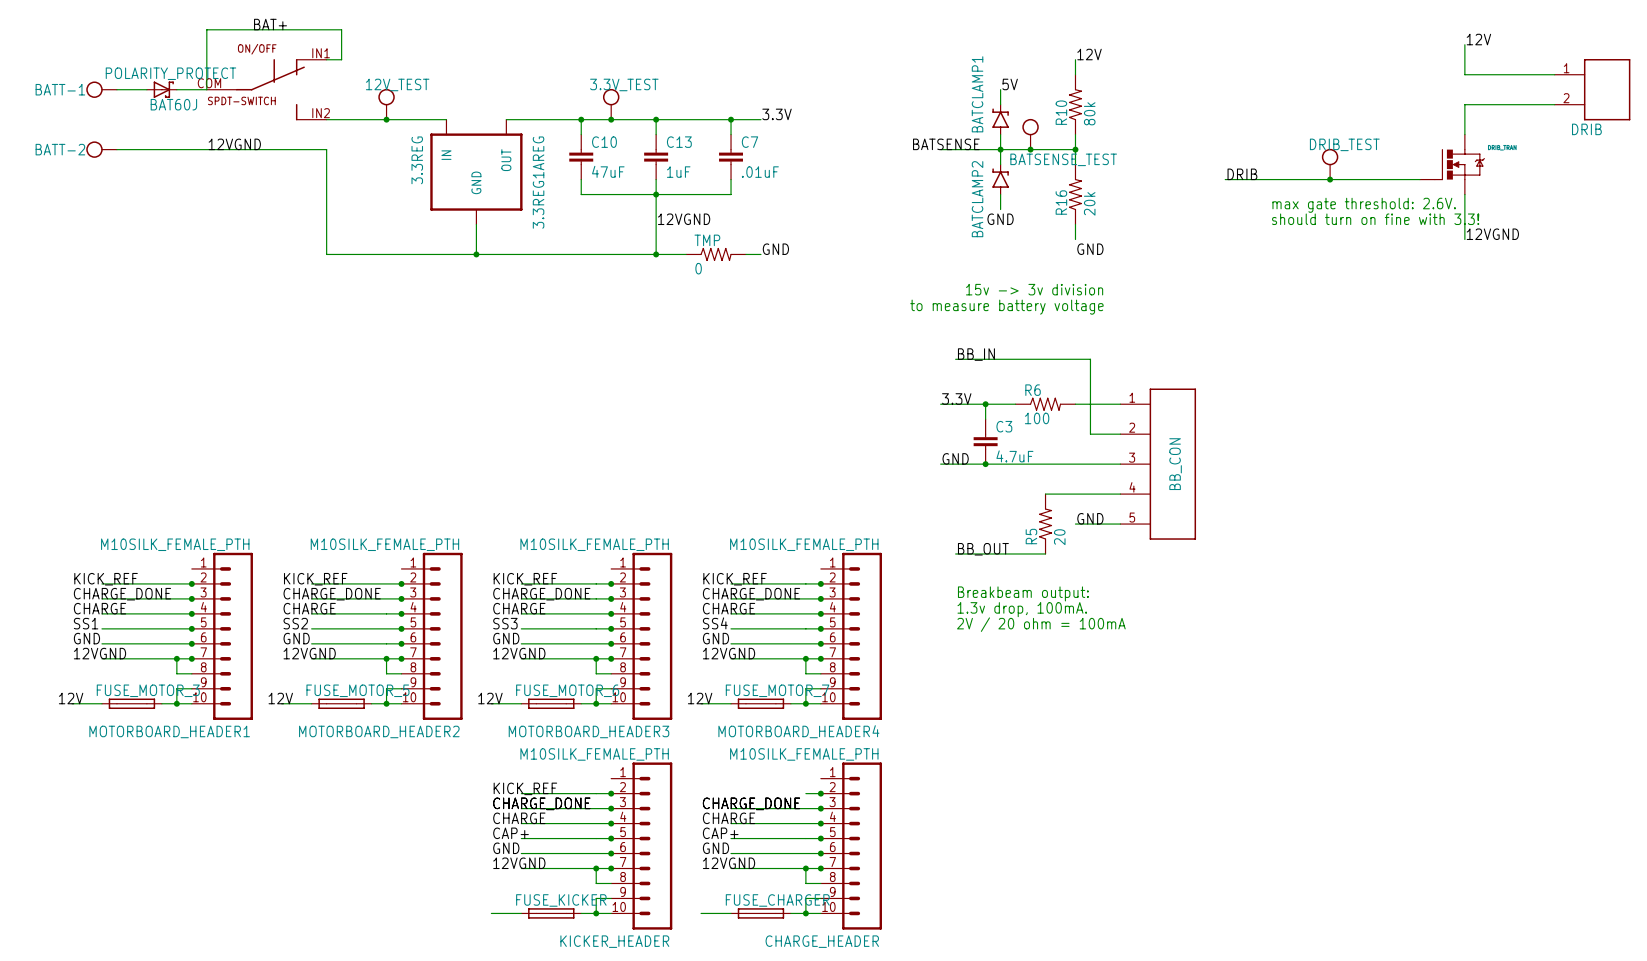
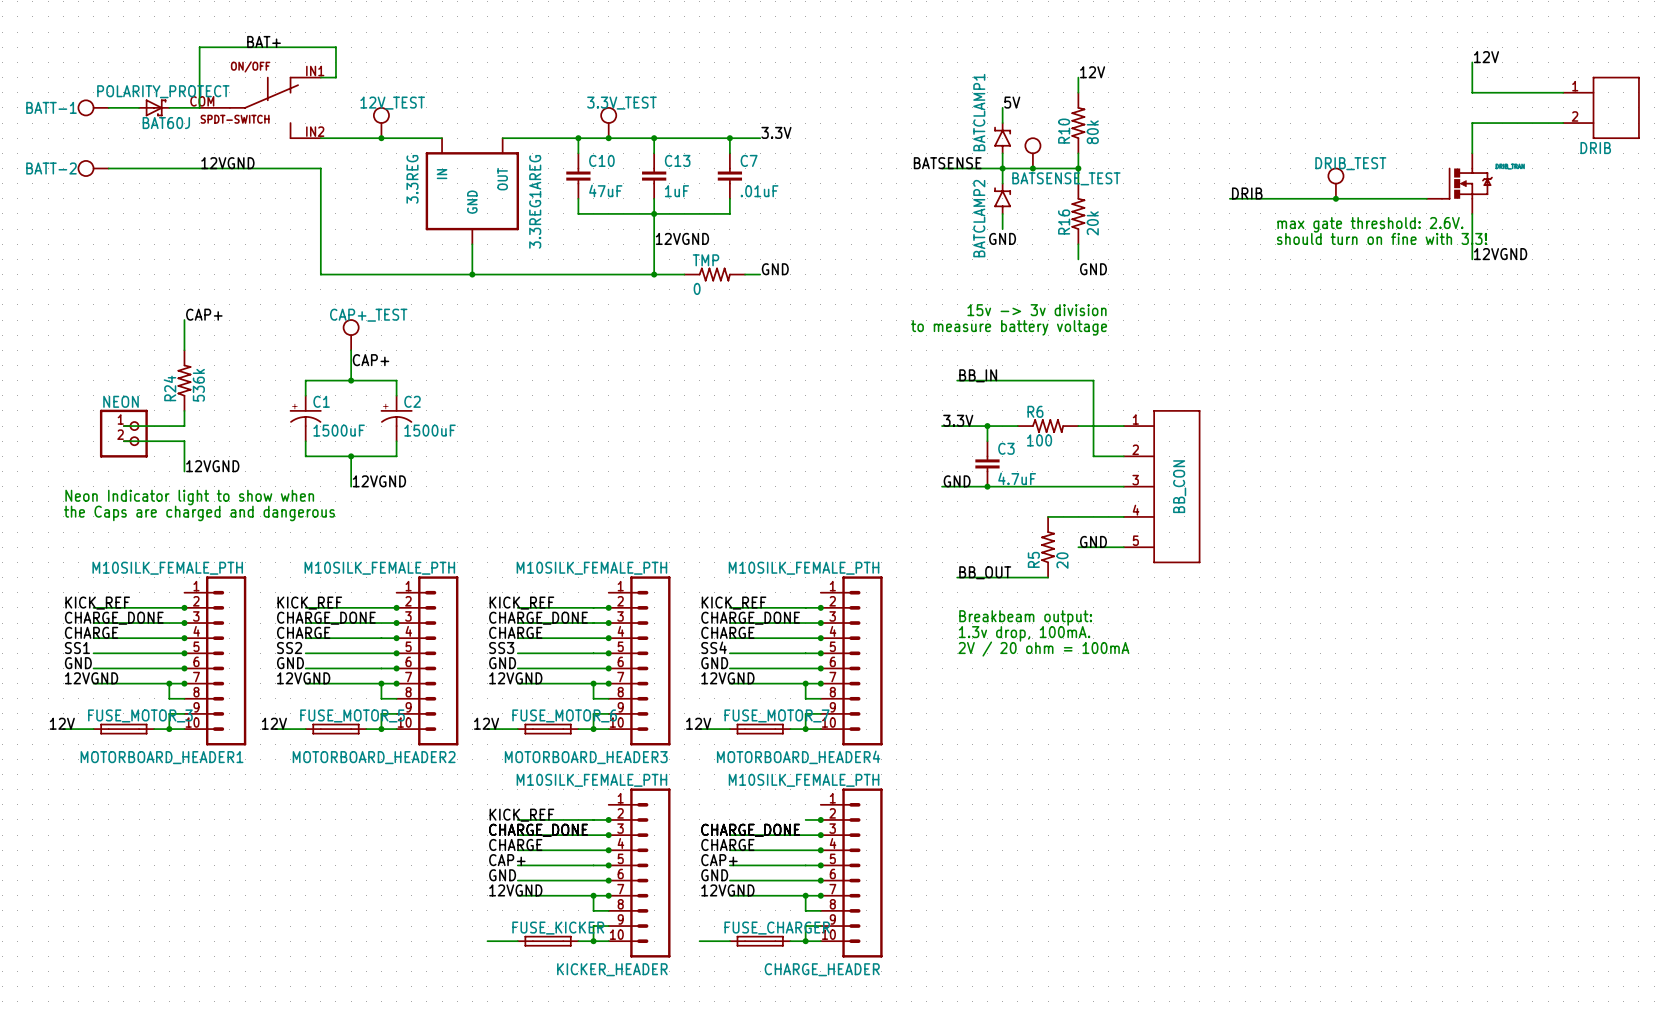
label: none -> CAP+ (204, 314)
wire: none -> (184, 320) (184, 350)
CAP+_TEST: none -> (351, 334)
wire: none -> (351, 350) (351, 380)
label: none -> CAP+ (371, 360)
R24: none -> 536k (184, 380)
junction: none -> (351, 380)
wire: none -> (305, 395) (305, 380) (396, 380) (396, 395)
wire: none -> (184, 410) (184, 426) (123, 426)
C1: none -> 1500uF (305, 418)
C2: none -> 1500uF (396, 418)
NEON: none -> (123, 433)
wire: none -> (123, 441) (184, 441) (184, 471)
wire: none -> (305, 441) (305, 456) (396, 456) (396, 441)
wire: none -> (351, 456) (351, 486)
junction: none -> (351, 456)
label: none -> 12VGND (212, 466)
label: none -> 12VGND (379, 481)
text: none -> Neon Indicator light to show when (189, 497)
text: none -> the Caps are charged and dangerous (199, 513)

